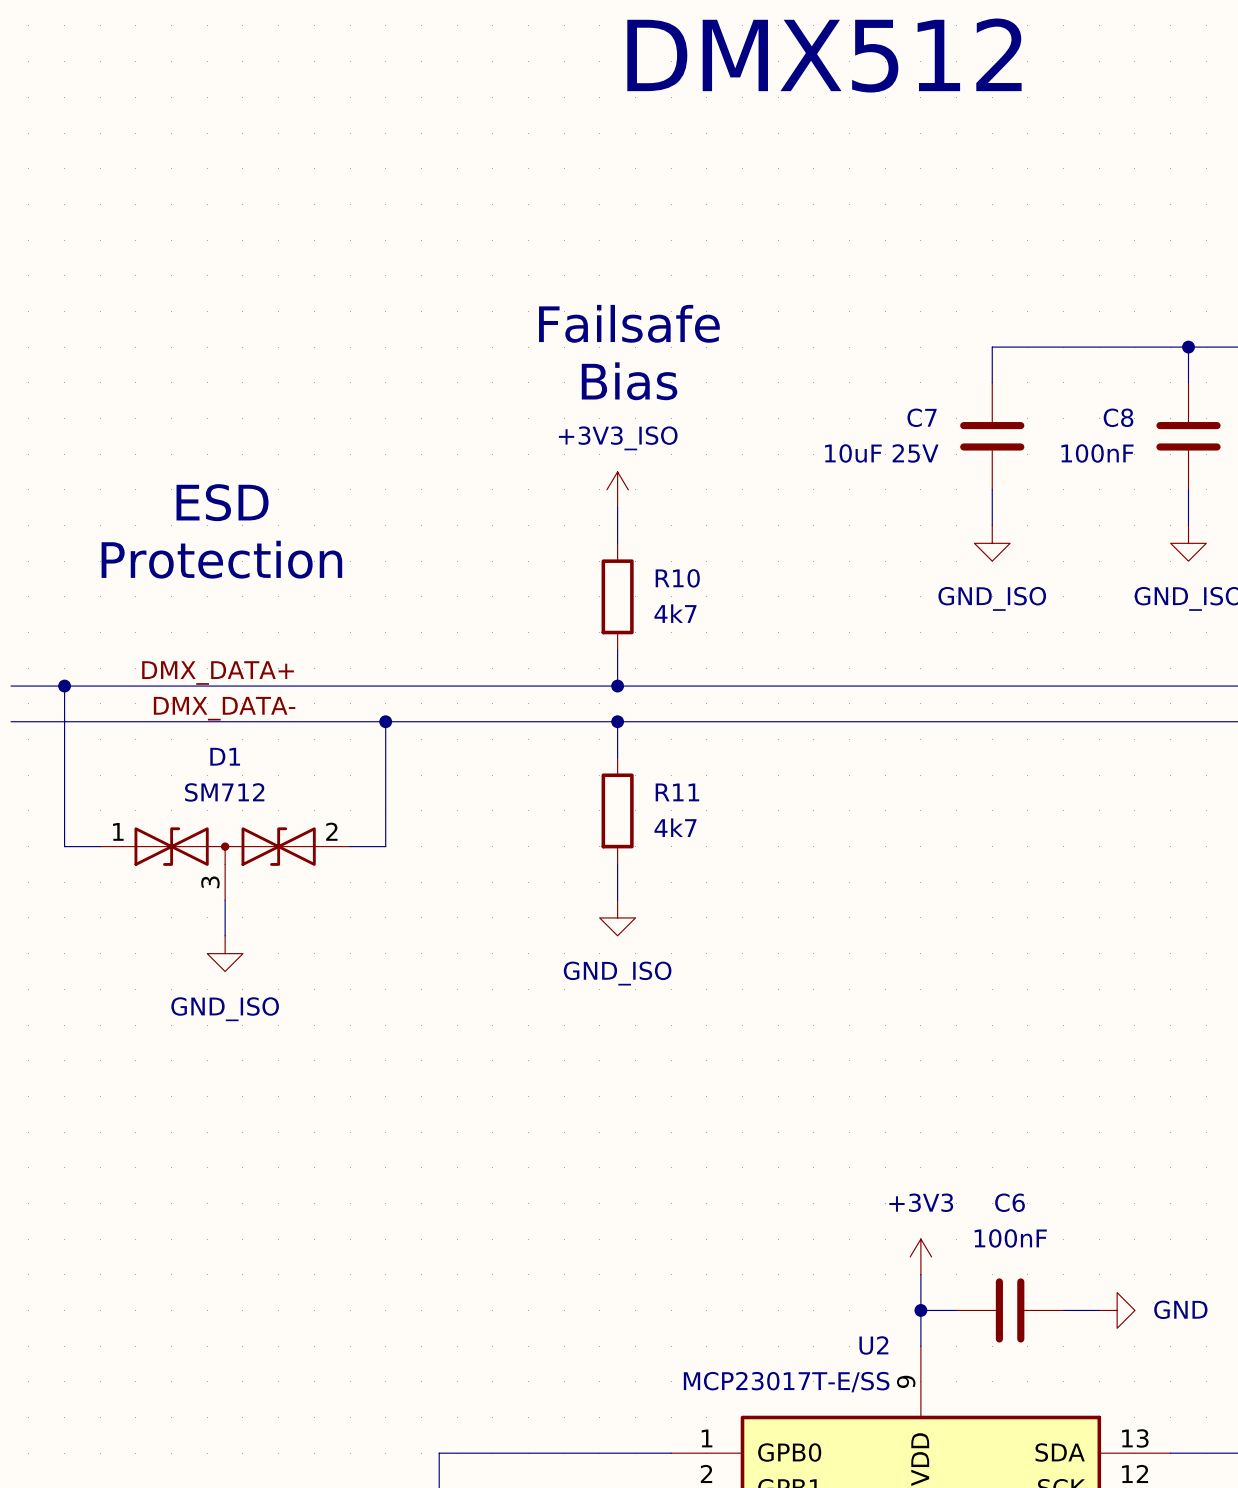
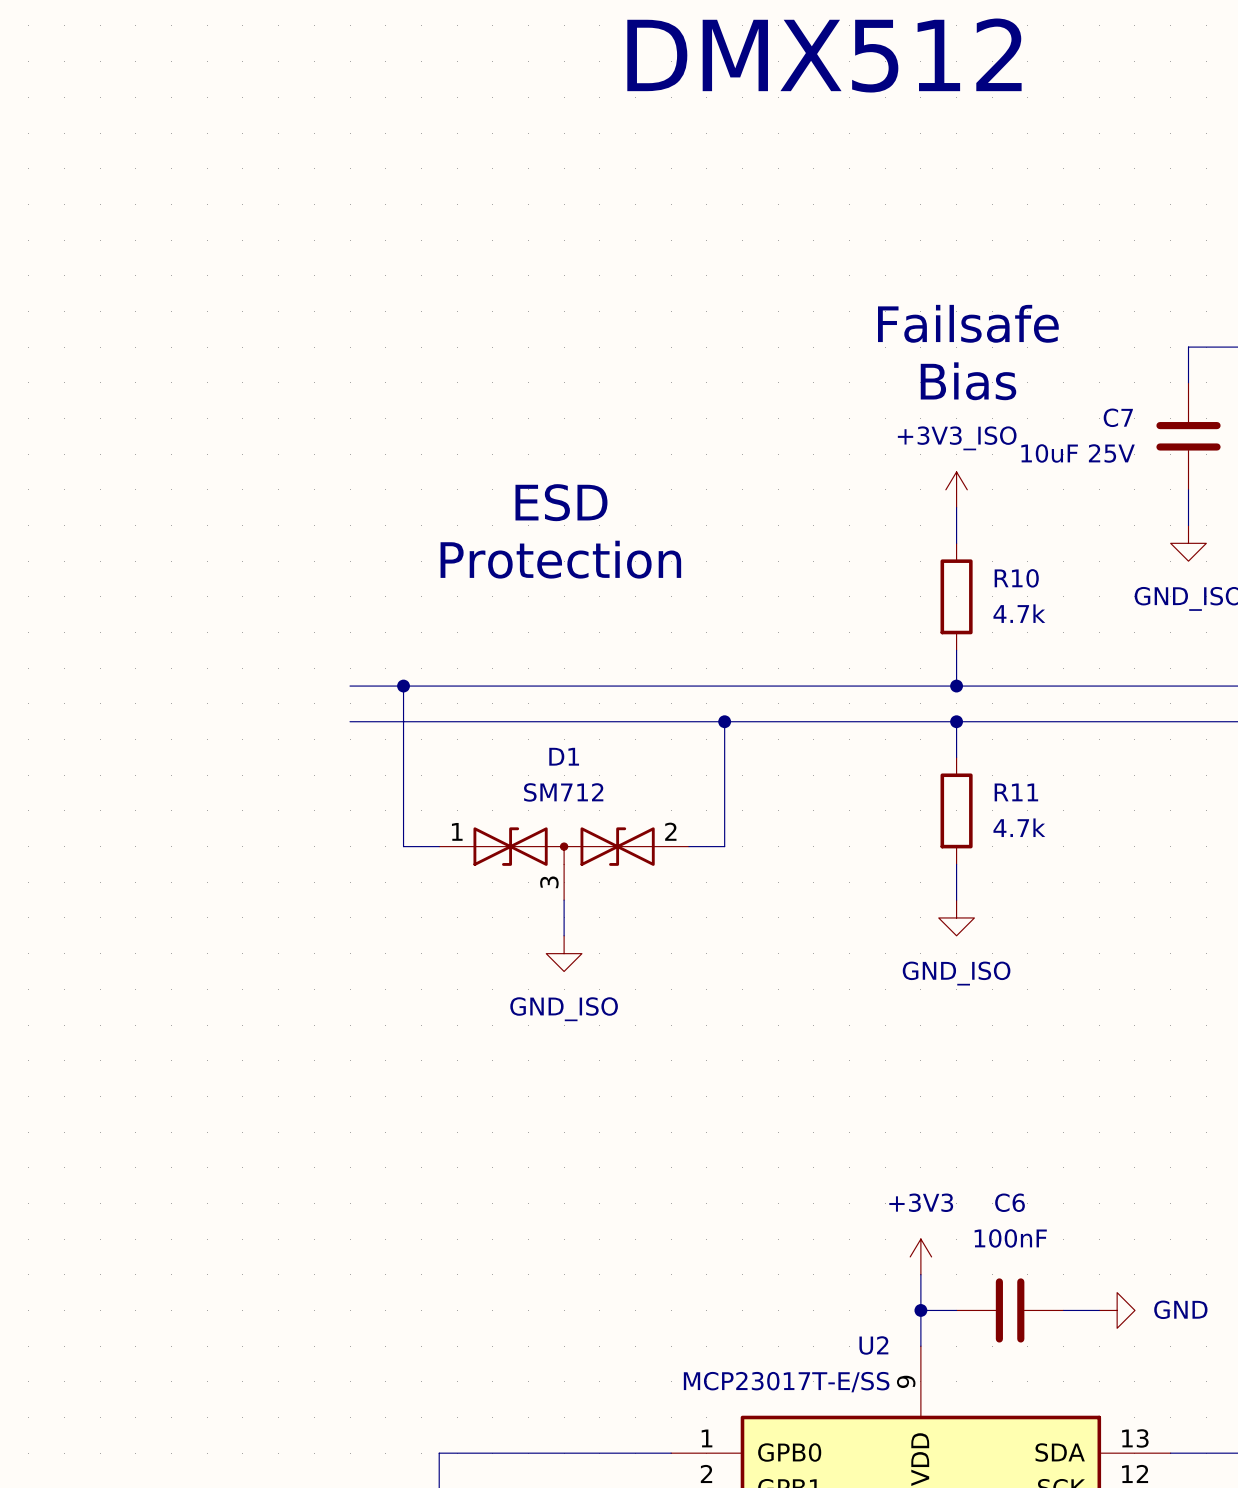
text position: Failsafe (629, 323) -> Failsafe (968, 323)
wire: (1188, 347) (992, 347) (992, 382) -> none
junction: (1188, 347) -> none
text position: Bias (629, 381) -> Bias (968, 381)
C8 name: C8 (1118, 417) -> C7 (1118, 417)
C7: 10uF 25V (992, 436) -> none
C8 value: 100nF (1097, 453) -> 10uF 25V (1078, 453)
power symbol position: +3V3_ISO (617, 489) -> +3V3_ISO (956, 489)
wire: (992, 489) (992, 525) -> none
text position: ESD (222, 502) -> ESD (561, 502)
wire: (617, 507) (617, 543) -> (956, 507) (956, 543)
power symbol: GND_ISO (992, 543) -> none
text position: Protection (221, 559) -> Protection (560, 559)
R10 position: (617, 596) -> (956, 596)
R10 value: 4k7 (675, 613) -> 4.7k (1019, 613)
wire: (617, 650) (617, 686) -> (956, 650) (956, 686)
label: DMX_DATA+ (218, 673) -> none
wire: (11, 686) (350, 686) -> none
wire: (64, 686) (64, 846) (100, 846) -> (403, 686) (403, 846) (439, 846)
junction: (64, 686) -> none
junction: (617, 686) -> none
junction: none -> (956, 686)
label: DMX_DATA- (224, 708) -> none
wire: (11, 721) (350, 721) -> none
wire: (385, 721) (385, 846) (350, 846) -> (724, 721) (724, 846) (688, 846)
junction position: (385, 721) -> (403, 686)
wire: (617, 721) (617, 757) -> (956, 721) (956, 757)
junction: (617, 721) -> none
junction: none -> (724, 721)
junction: none -> (956, 721)
R11 position: (617, 810) -> (956, 810)
R11 value: 4k7 (675, 827) -> 4.7k (1019, 827)
D1 position: (225, 863) -> (564, 863)
wire: (617, 864) (617, 900) -> (956, 864) (956, 900)
wire: (225, 900) (225, 935) -> (564, 900) (564, 935)
power symbol position: GND_ISO (617, 917) -> GND_ISO (564, 953)
power symbol: none -> GND_ISO (956, 917)
power symbol: GND_ISO (225, 953) -> none

